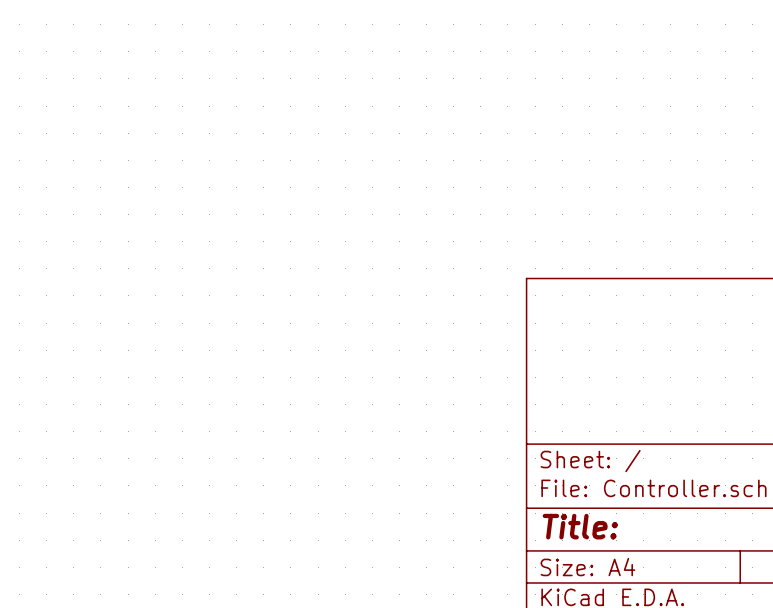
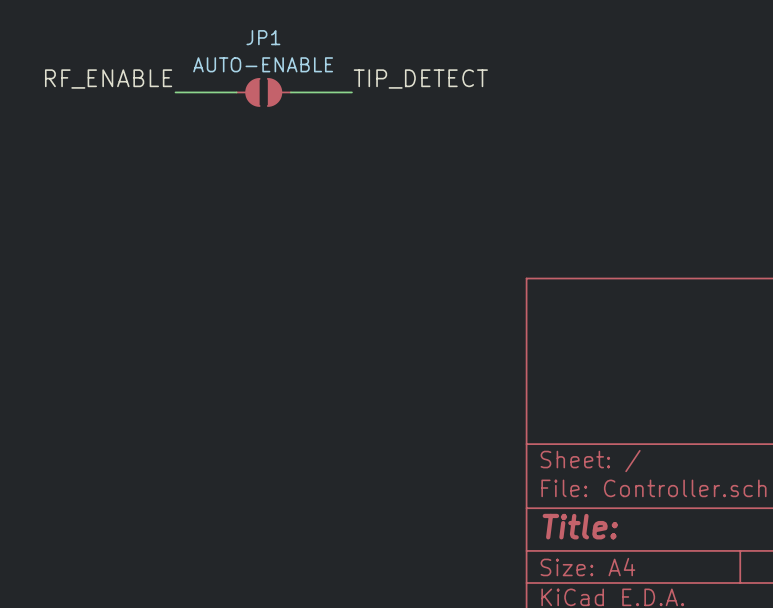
label: none -> RF_ENABLE (108, 79)
label: none -> TIP_DETECT (420, 79)
wire: none -> (175, 92) (236, 92)
JP1: none -> AUTO-ENABLE (263, 92)
wire: none -> (290, 92) (351, 92)

